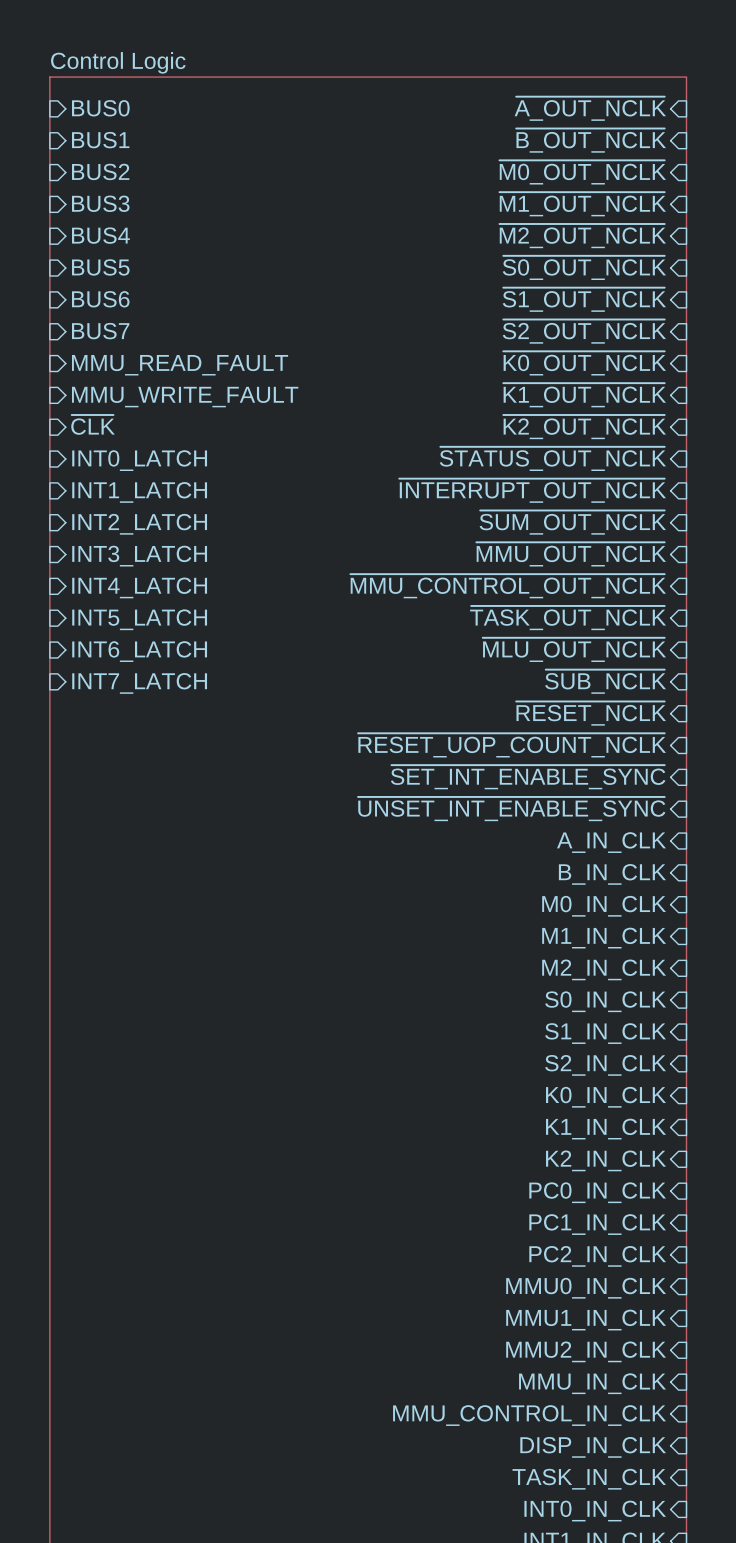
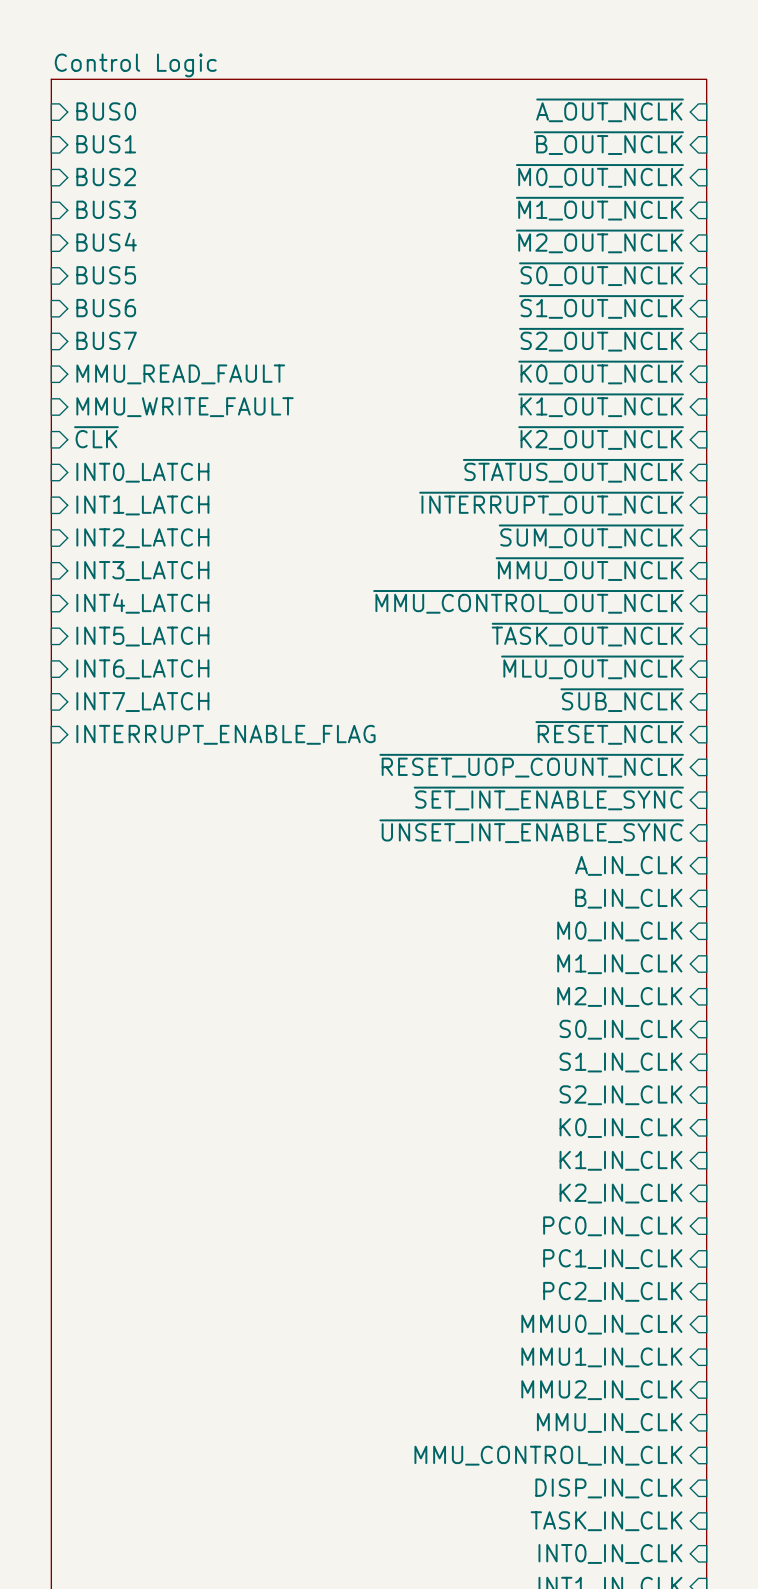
sheet pin: none -> INTERRUPT_ENABLE_FLAG (225, 734)

